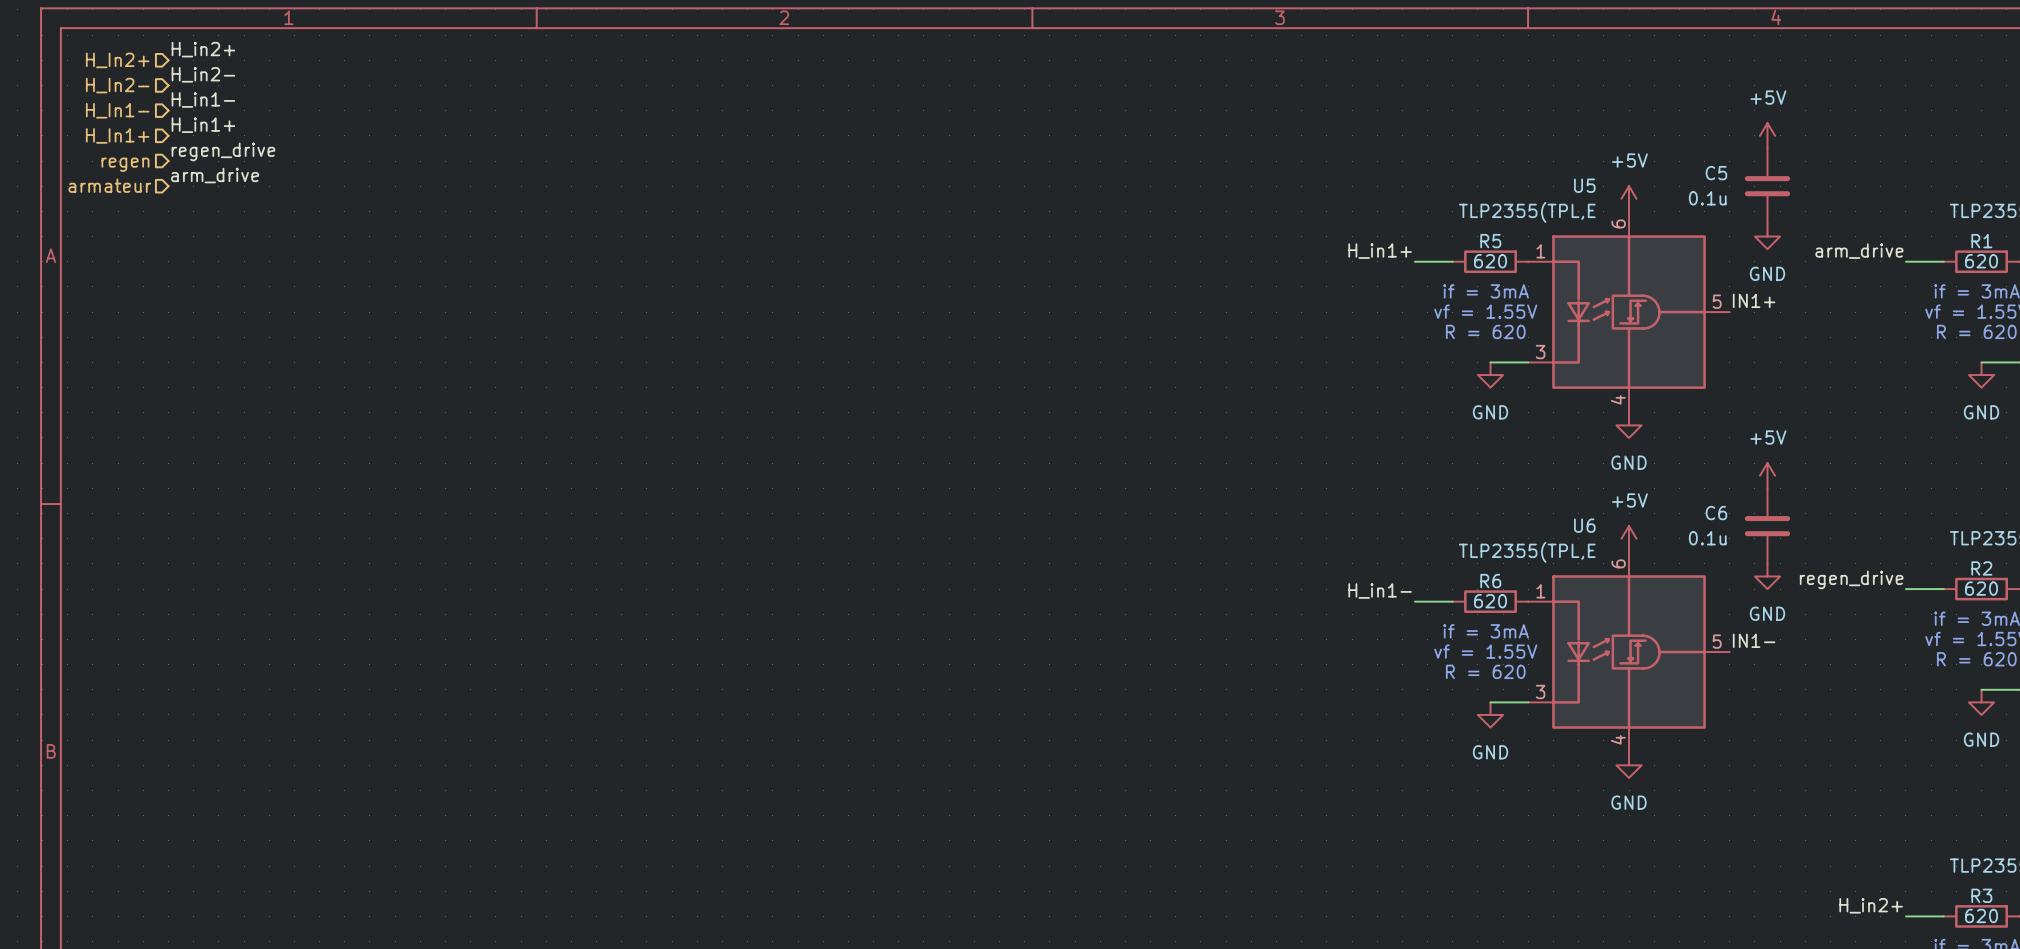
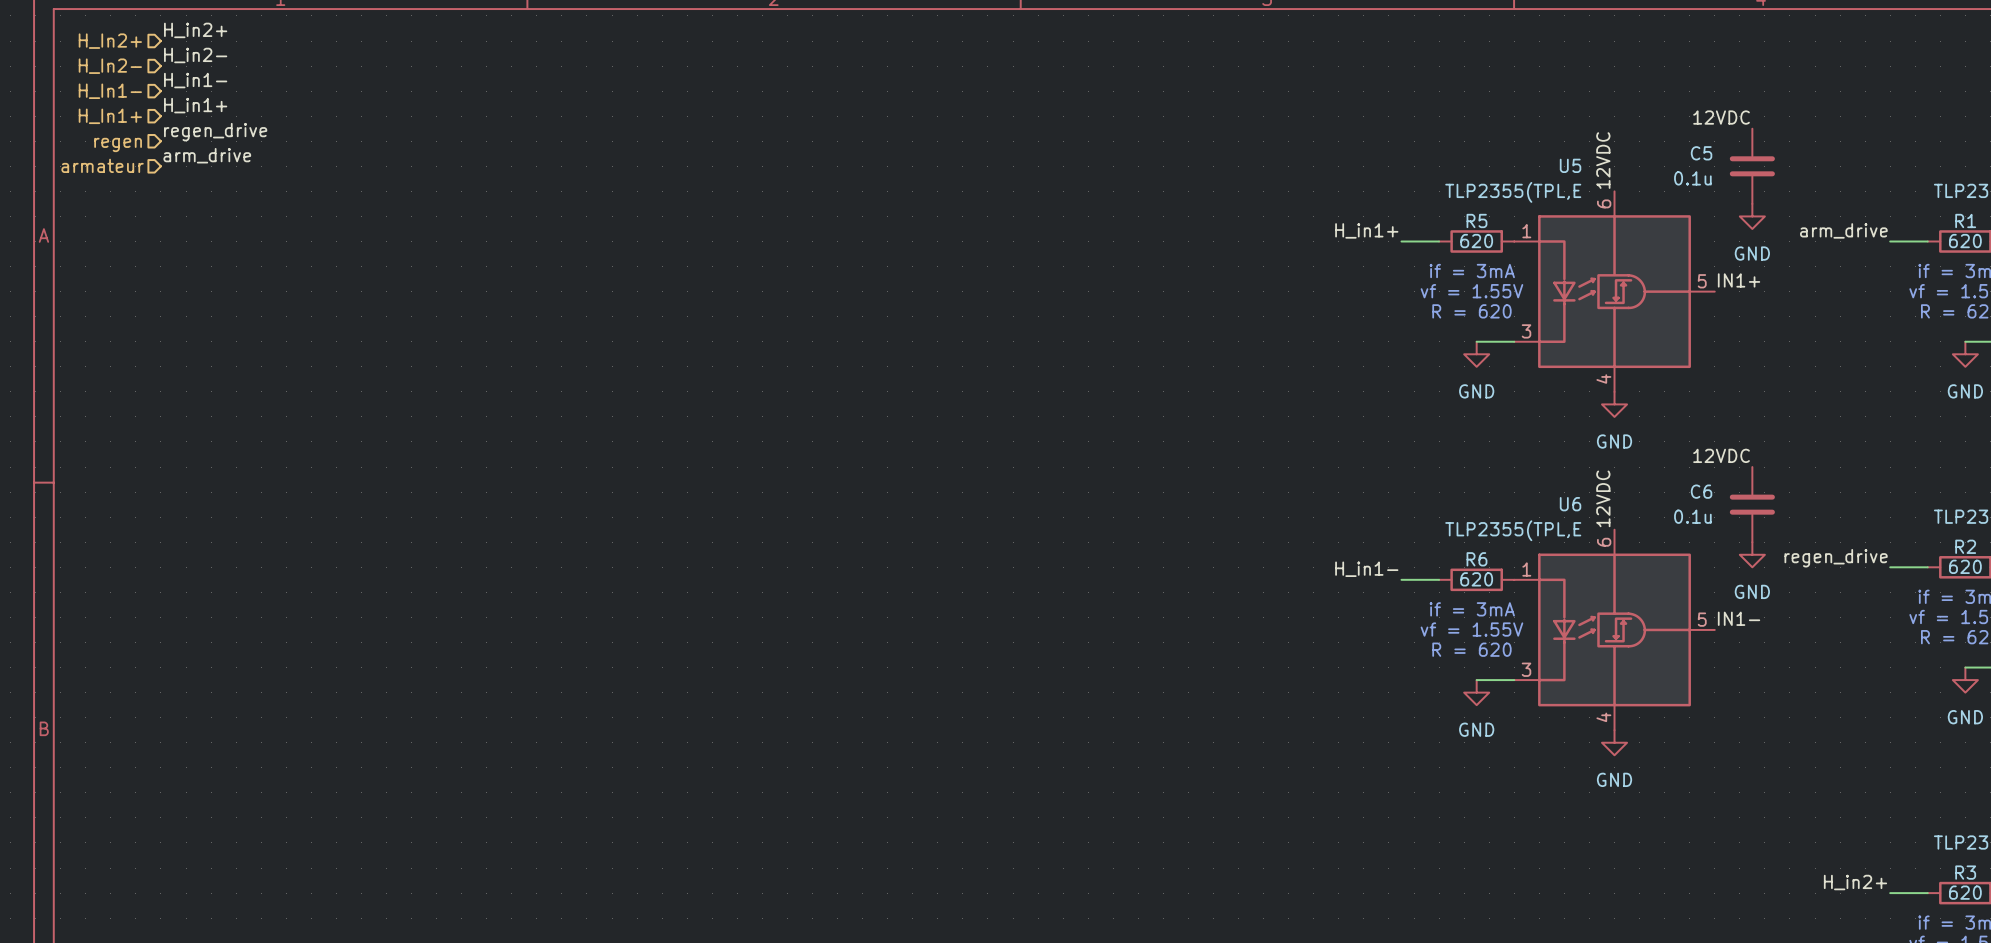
power symbol: +5V (1767, 135) -> none
label: none -> 12VDC (1721, 117)
label: none -> 12VDC (1603, 160)
power symbol: +5V (1629, 198) -> none
power symbol: +5V (1767, 475) -> none
label: none -> 12VDC (1721, 455)
label: none -> 12VDC (1603, 498)
power symbol: +5V (1629, 538) -> none

